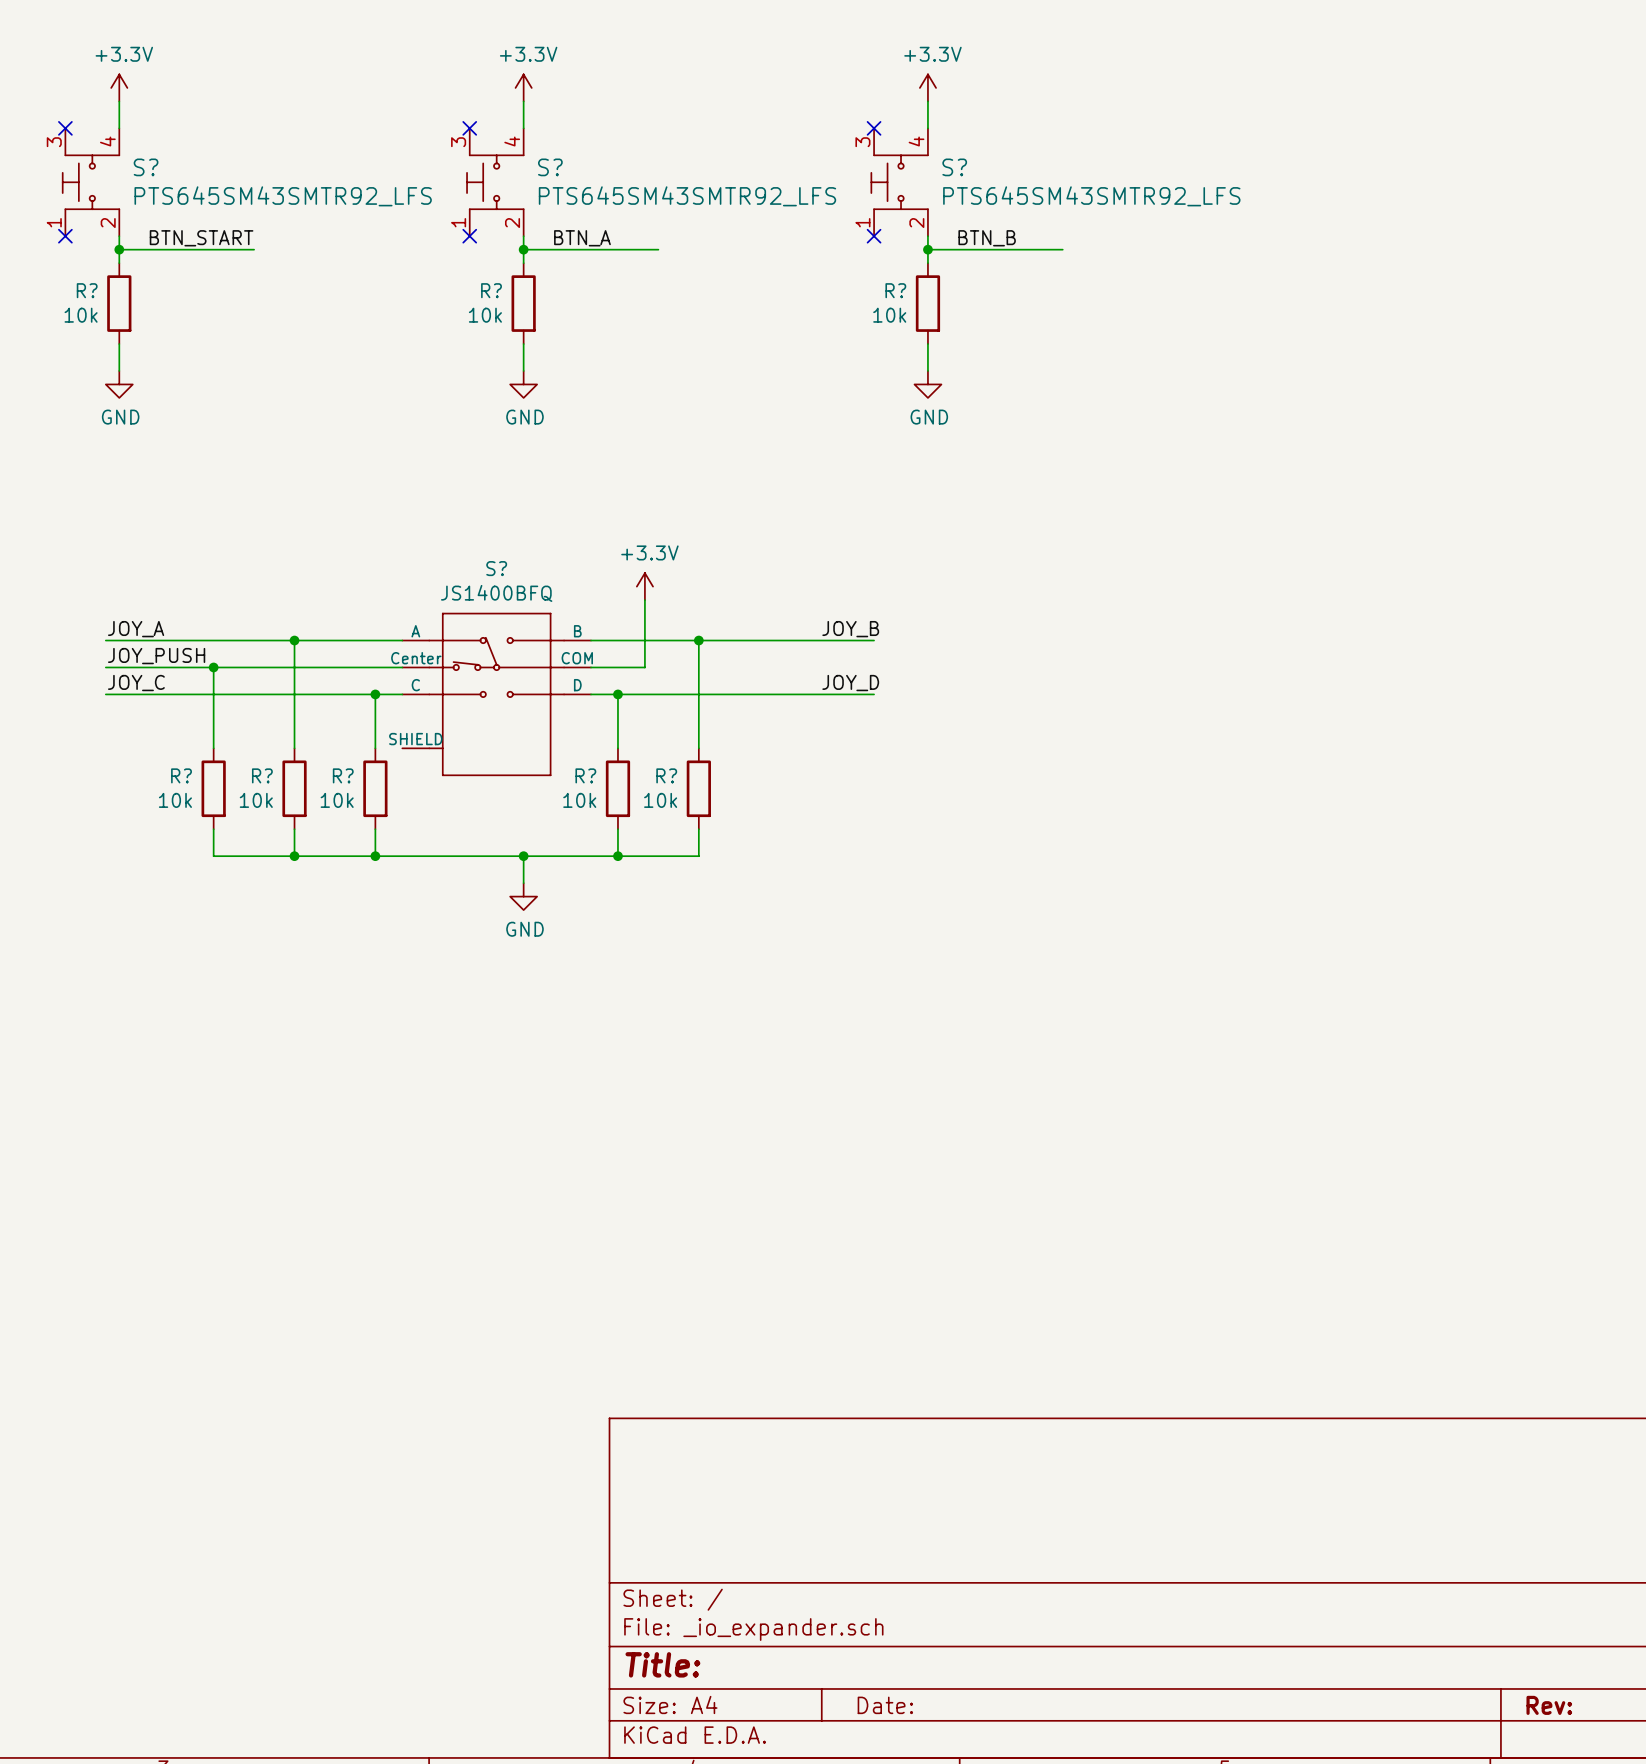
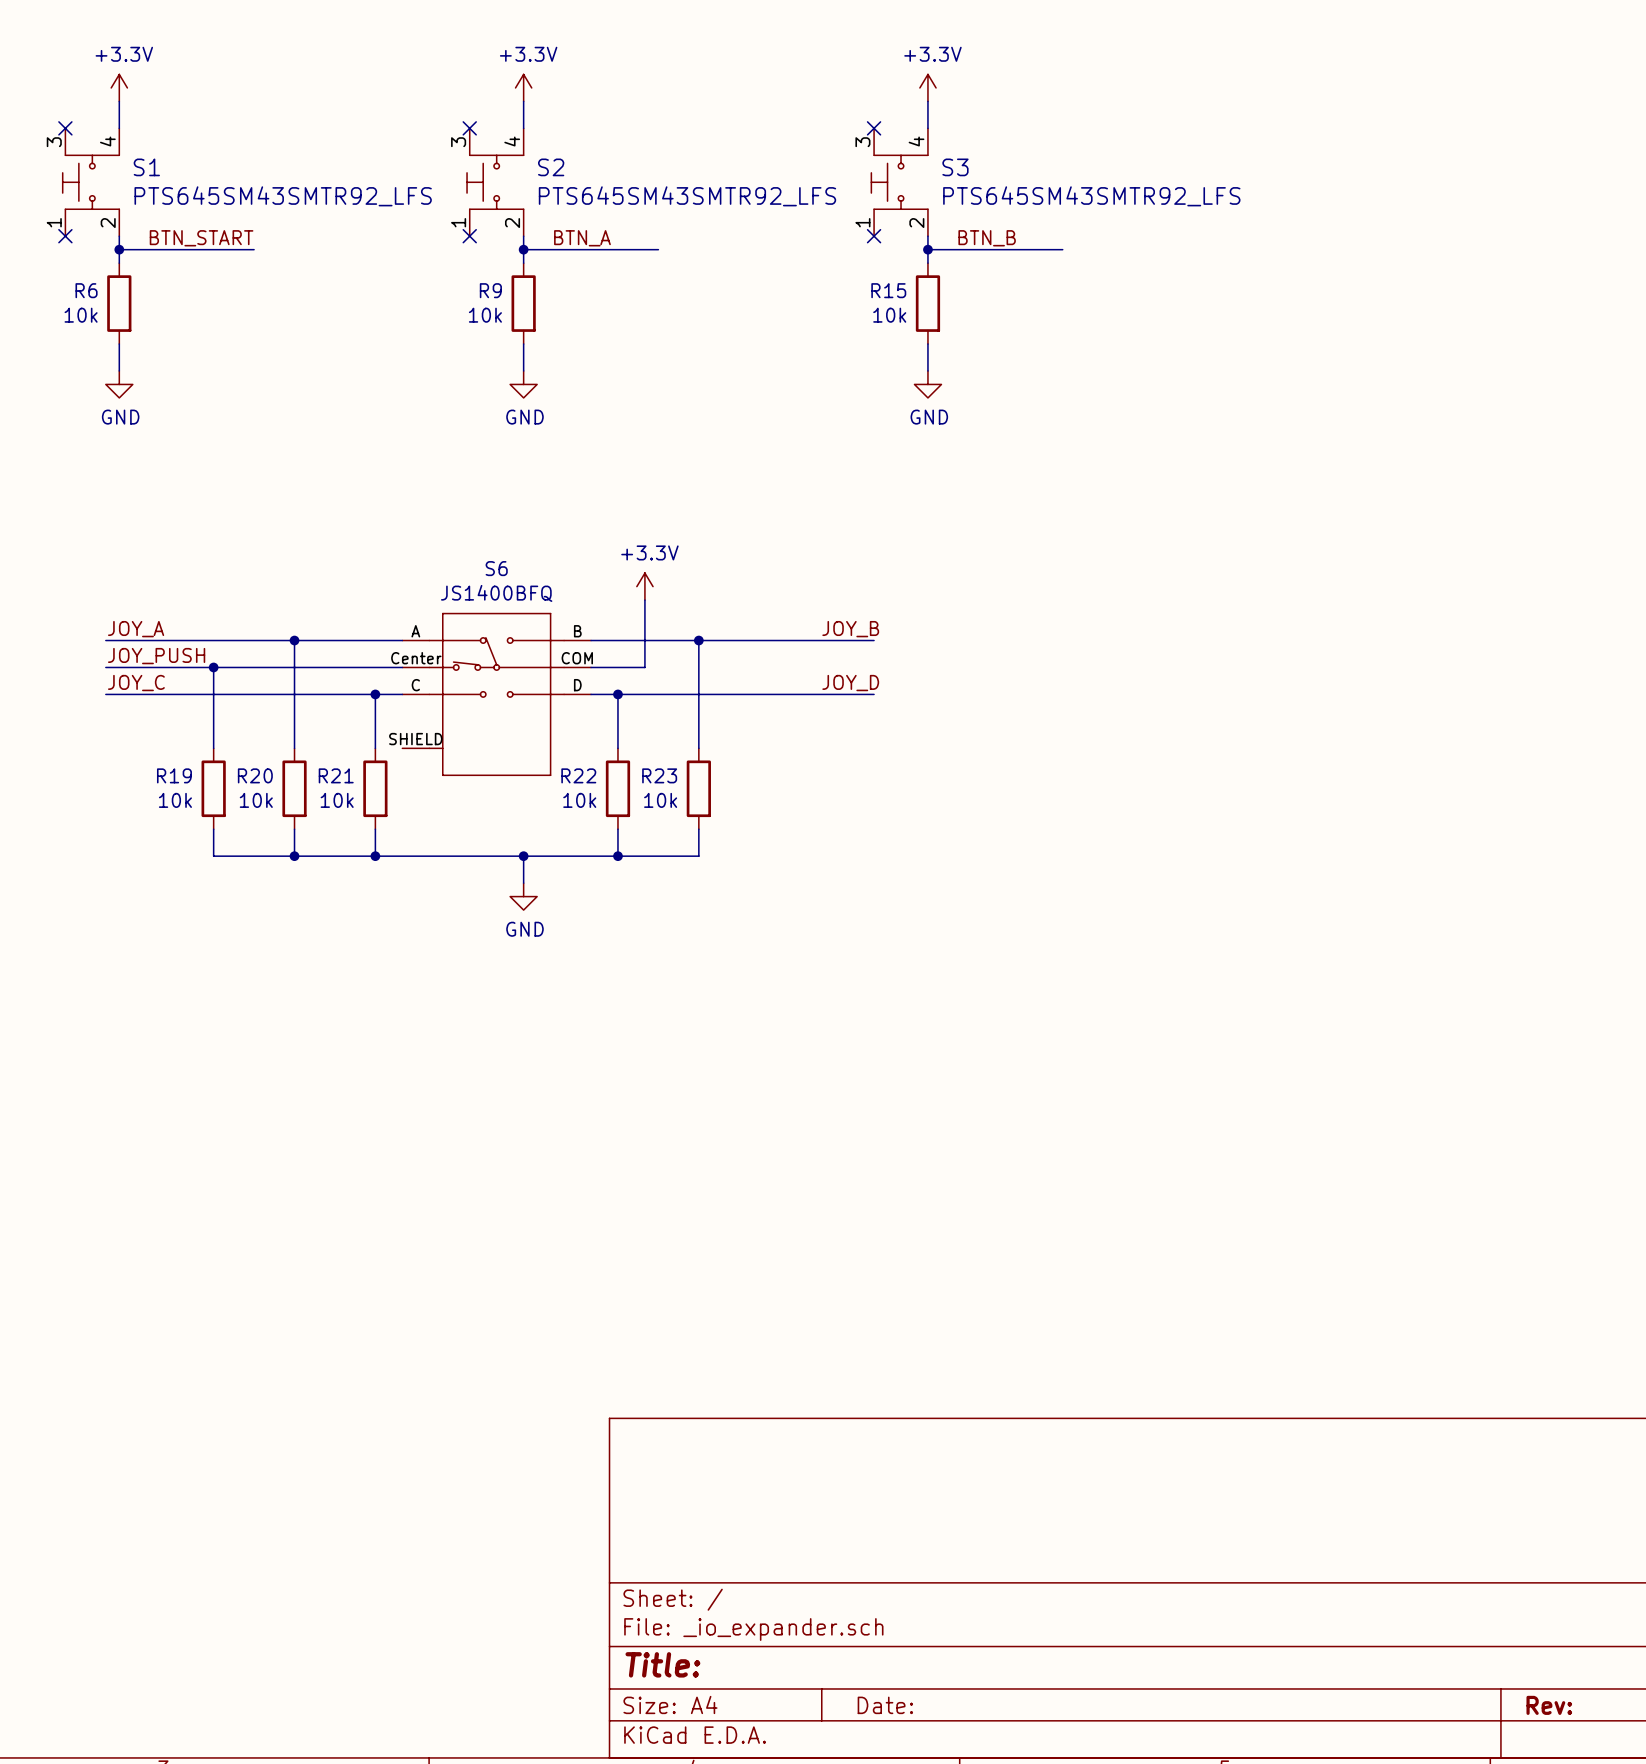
S? name: S? (146, 167) -> S1 (146, 167)
S? name: S? (550, 167) -> S2 (551, 167)
S? name: S? (954, 167) -> S3 (955, 167)
R? name: R? (87, 290) -> R6 (86, 290)
R? name: R? (491, 290) -> R9 (490, 290)
R? name: R? (895, 290) -> R15 (888, 290)
S? name: S? (496, 568) -> S6 (496, 568)
R? name: R? (181, 775) -> R19 (174, 775)
R? name: R? (262, 775) -> R20 (255, 775)
R? name: R? (343, 775) -> R21 (336, 775)
R? name: R? (585, 775) -> R22 (578, 775)
R? name: R? (666, 775) -> R23 (659, 775)

